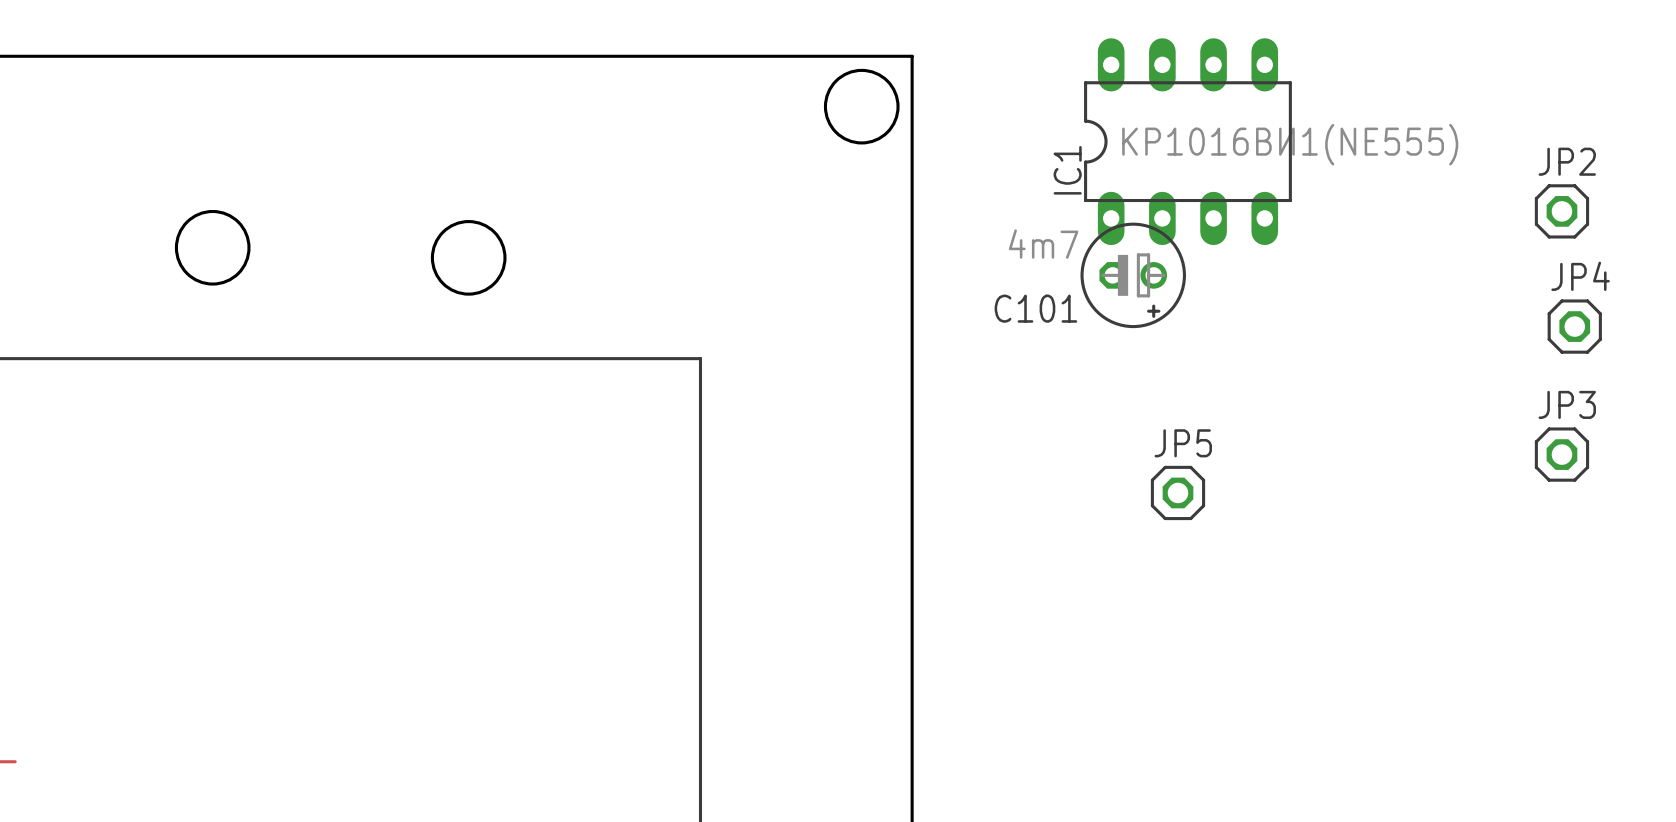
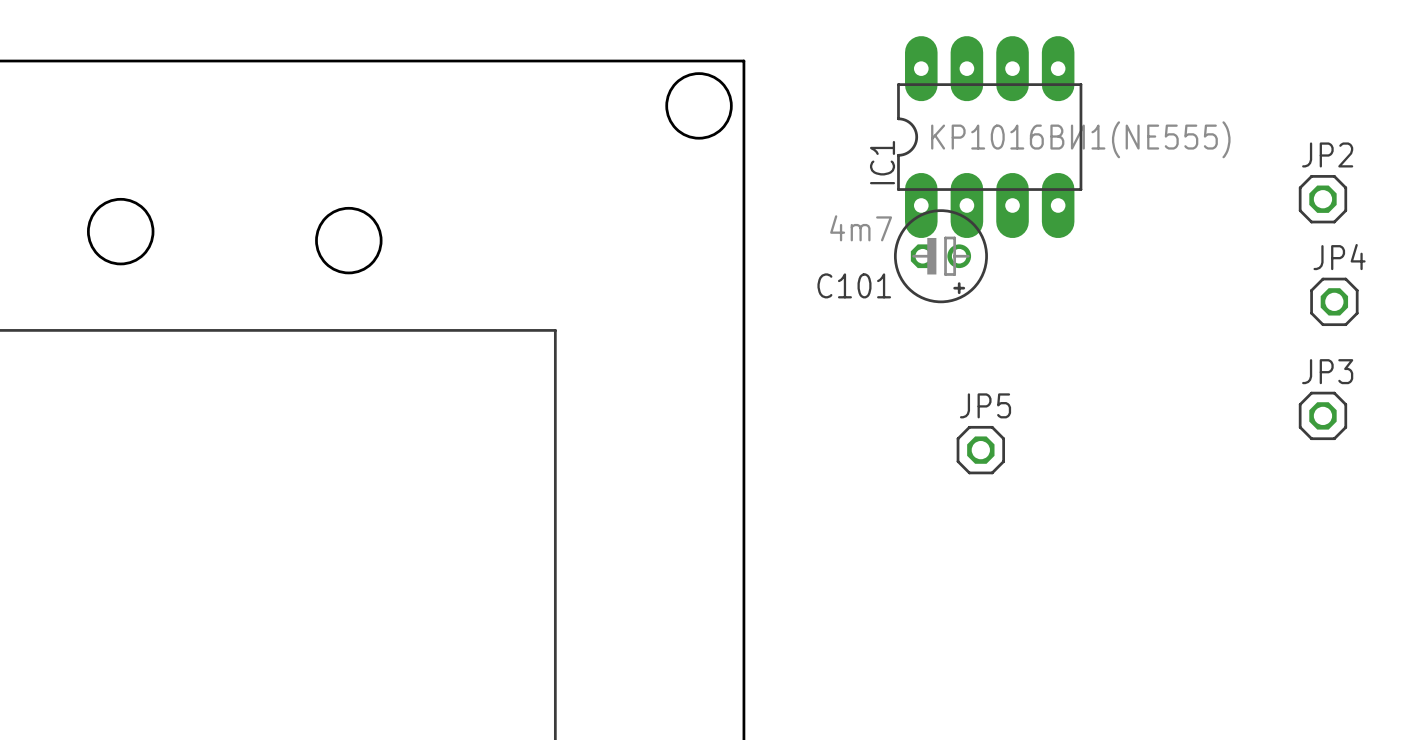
IC1 footprint: [1084, 38, 1292, 246] -> [897, 36, 1083, 239]

